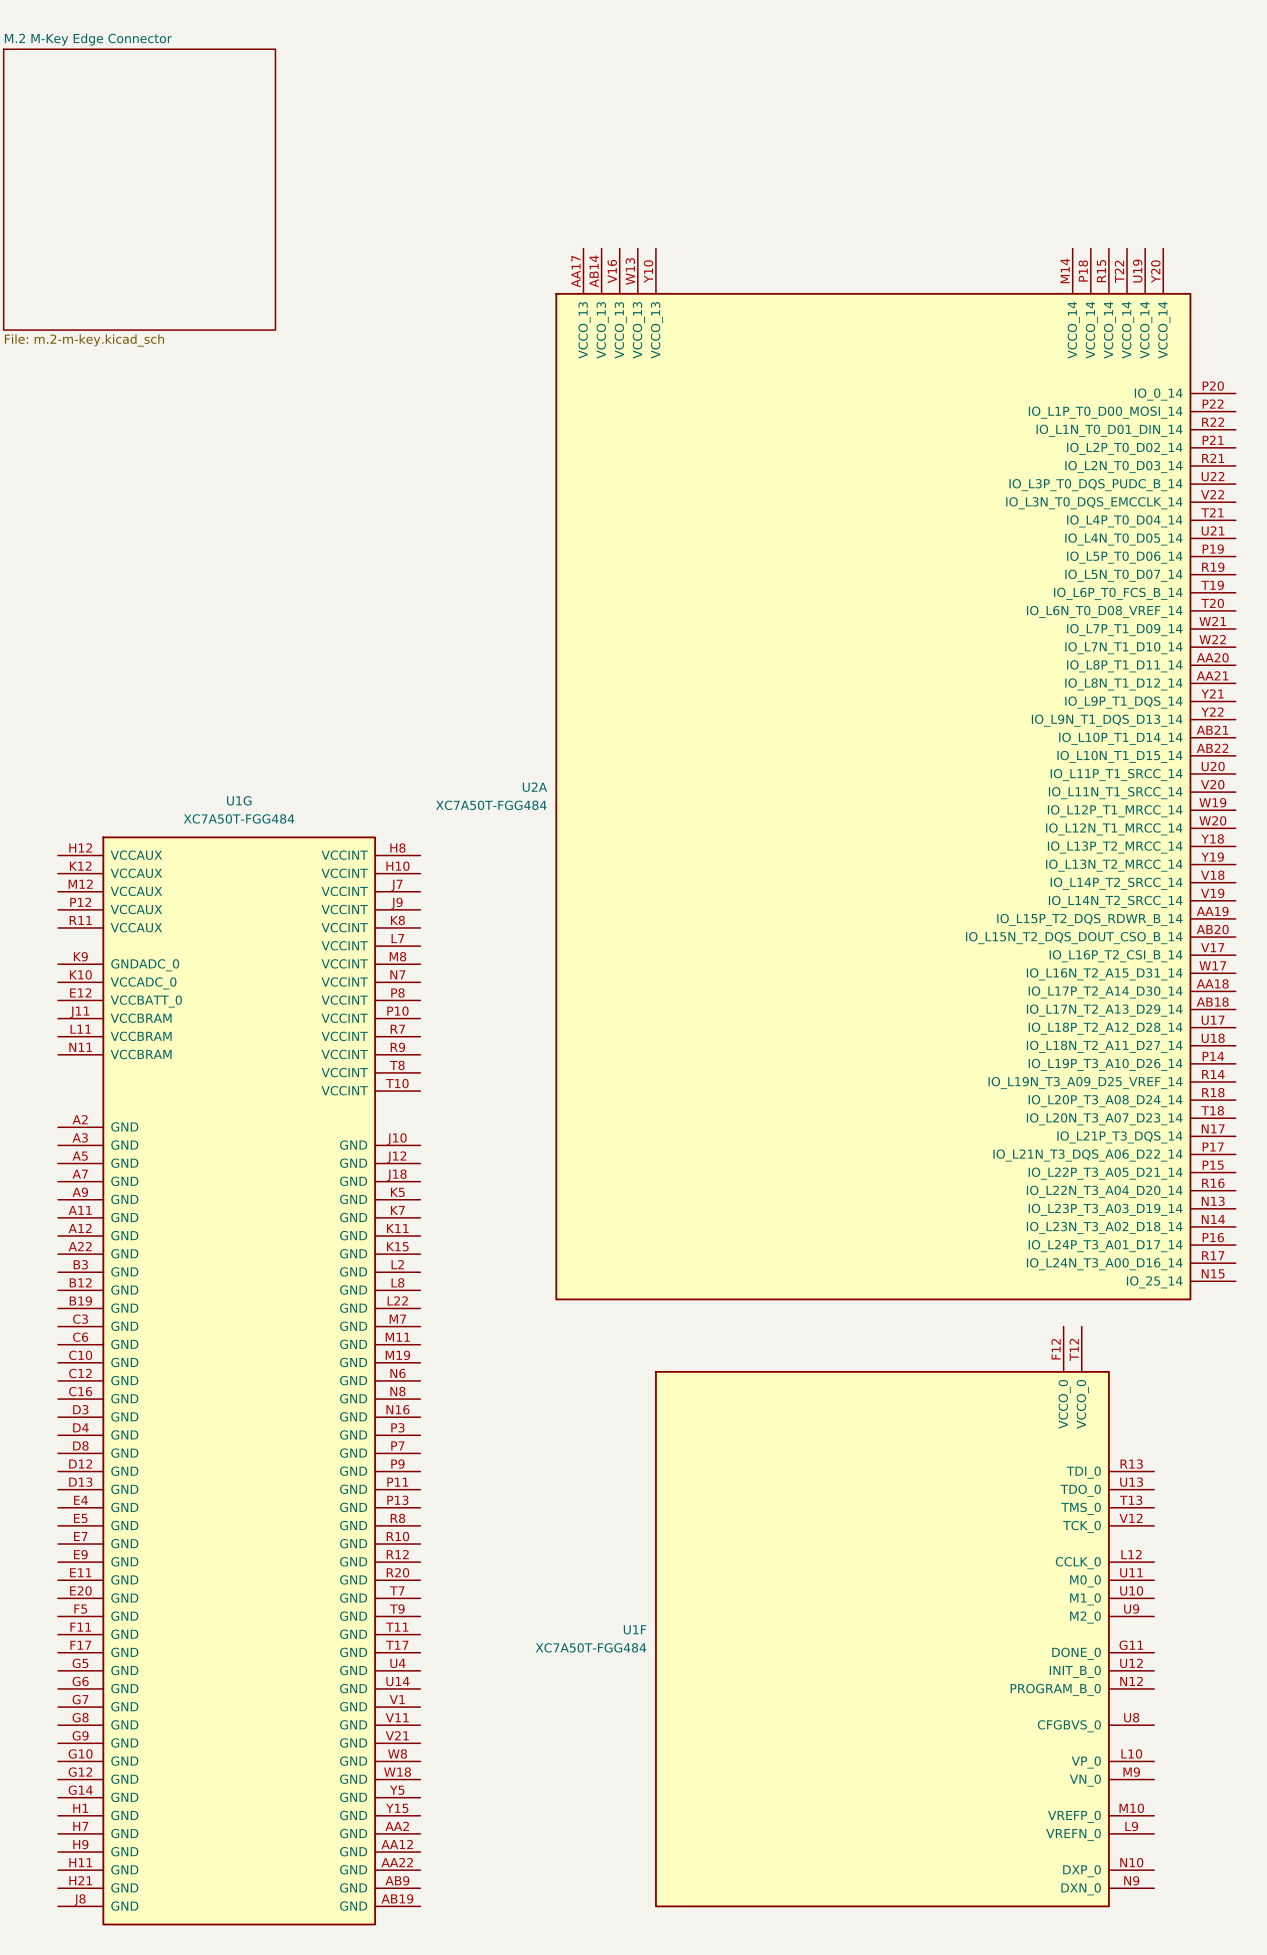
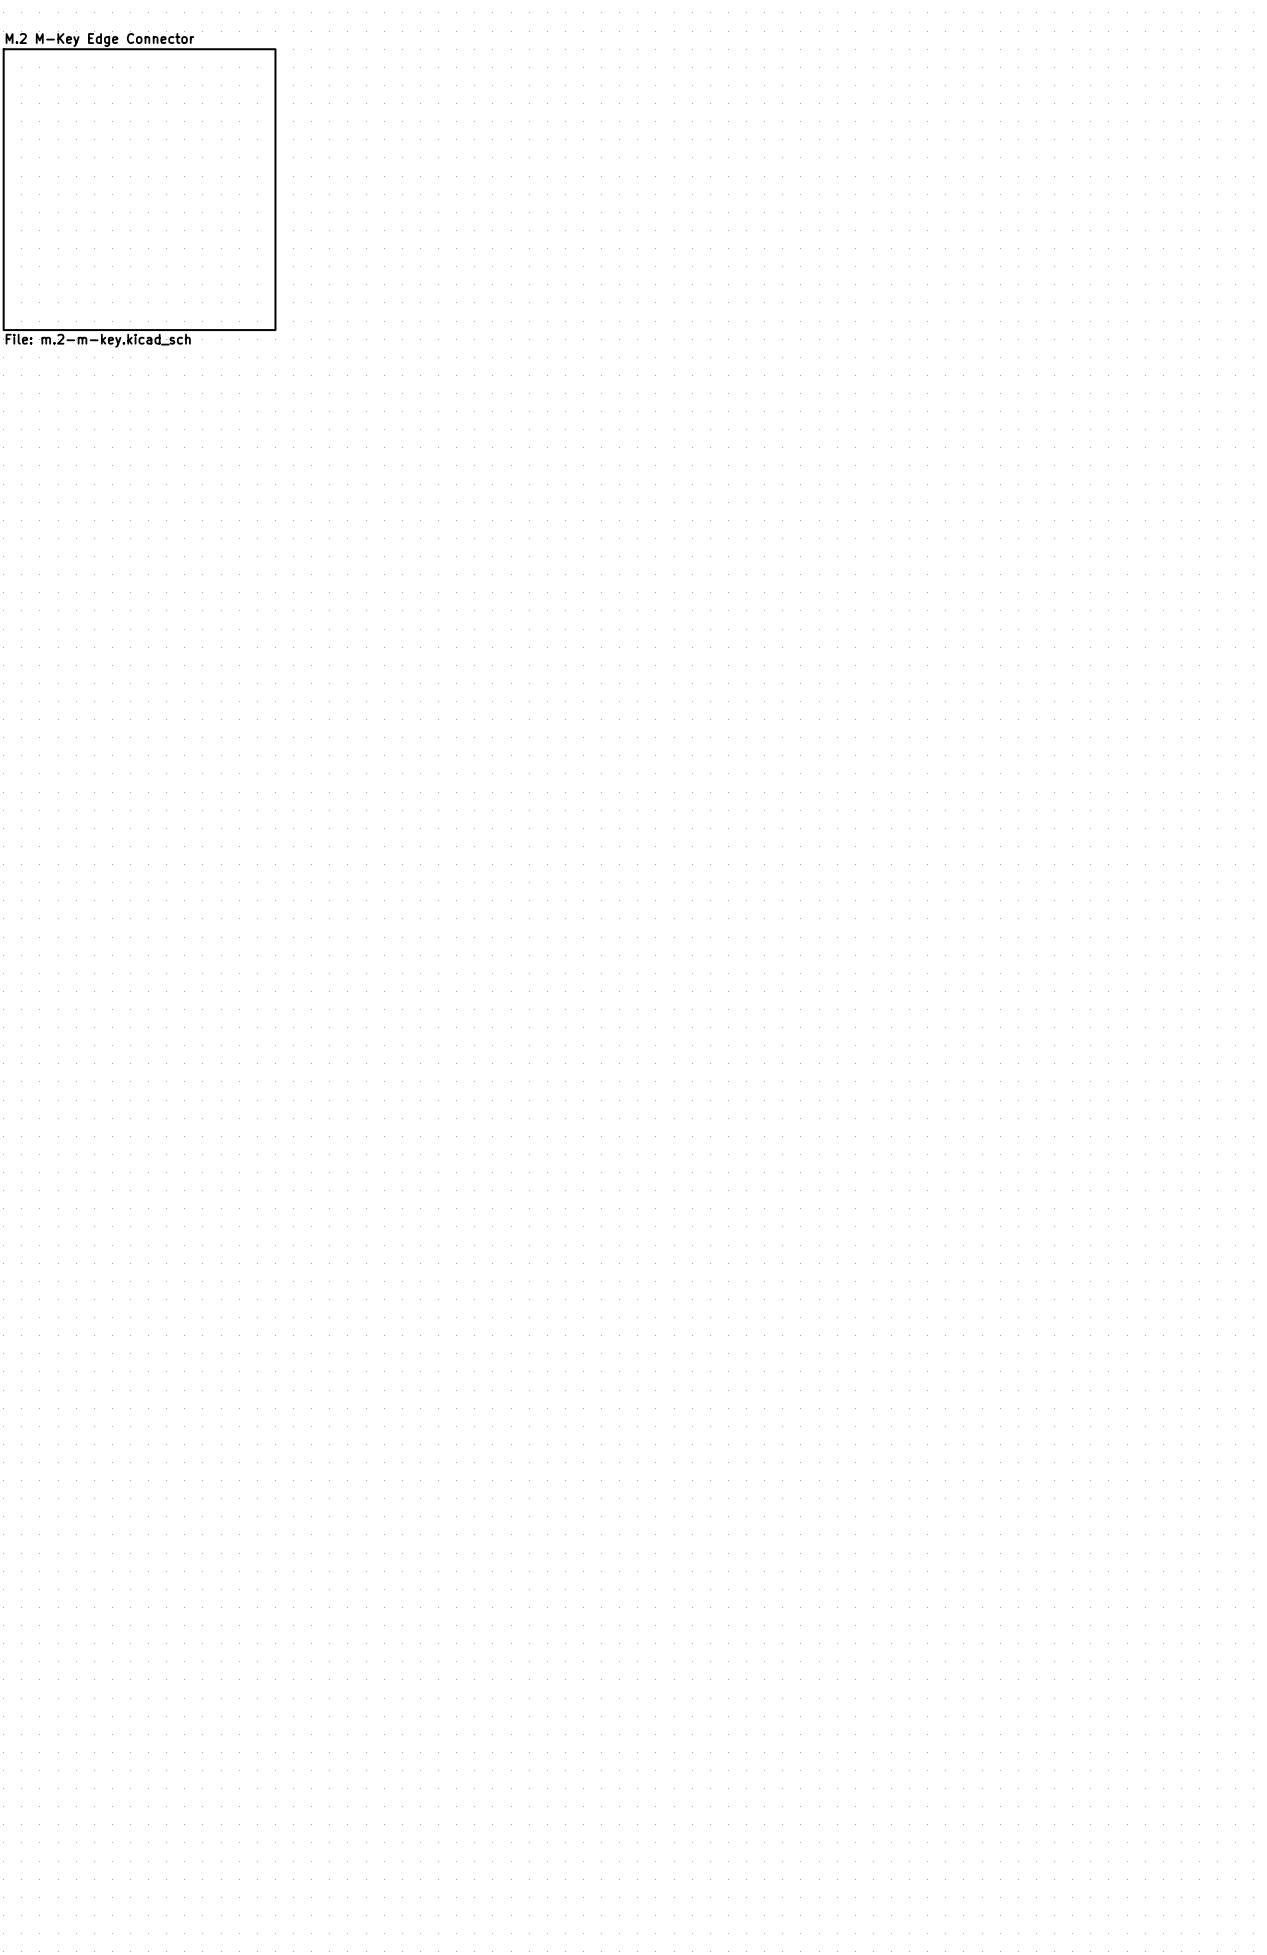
U2A: XC7A50T-FGG484 (895, 774) -> none
U1G: XC7A50T-FGG484 (239, 1380) -> none
U1F: XC7A50T-FGG484 (904, 1616) -> none

